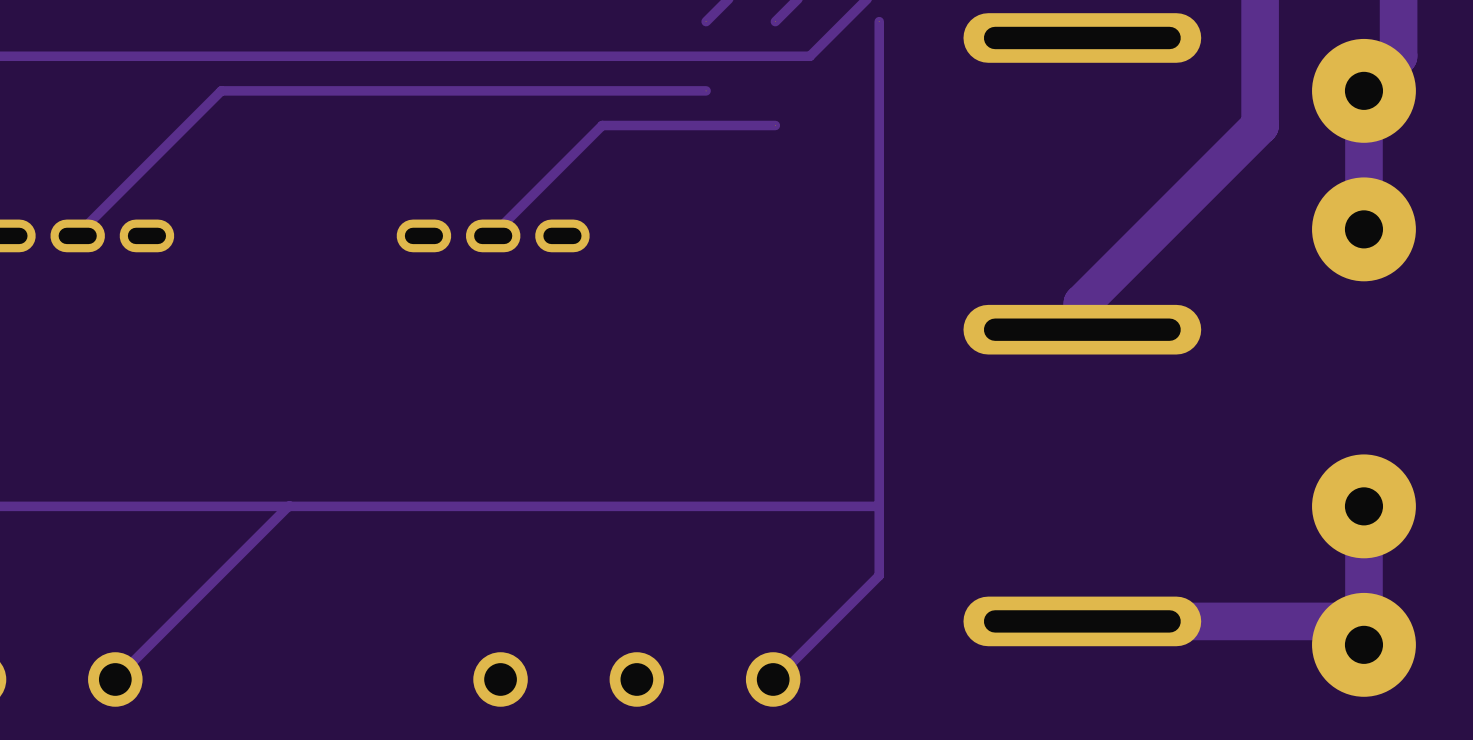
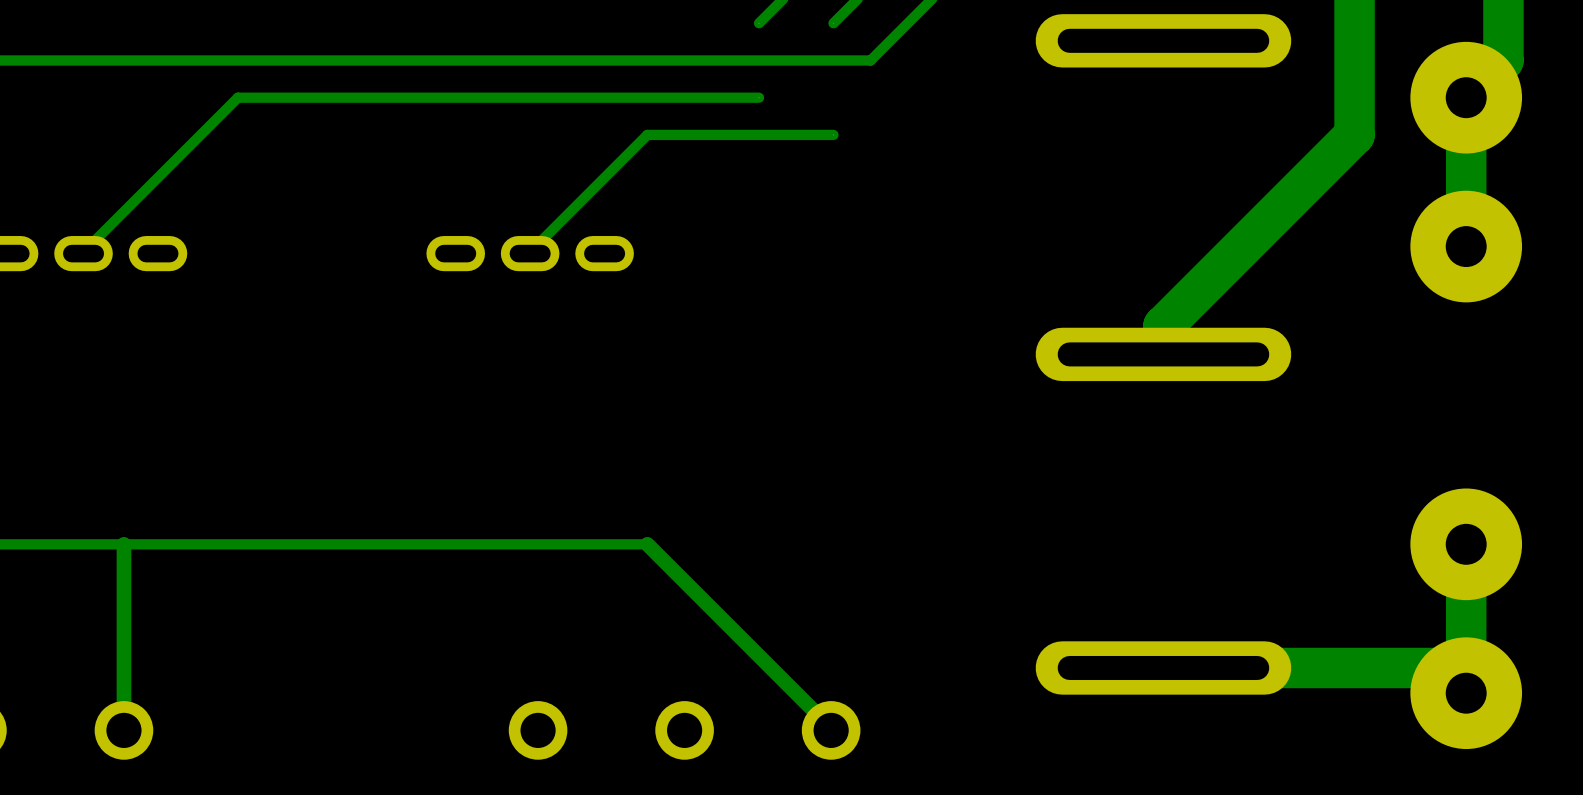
track: (879, 21) (879, 575) (775, 679) (773, 679) -> none
track: (288, 506) (115, 679) -> (123, 544) (123, 730)
track: (879, 506) (602, 506) -> (831, 730) (831, 728) (647, 544)

